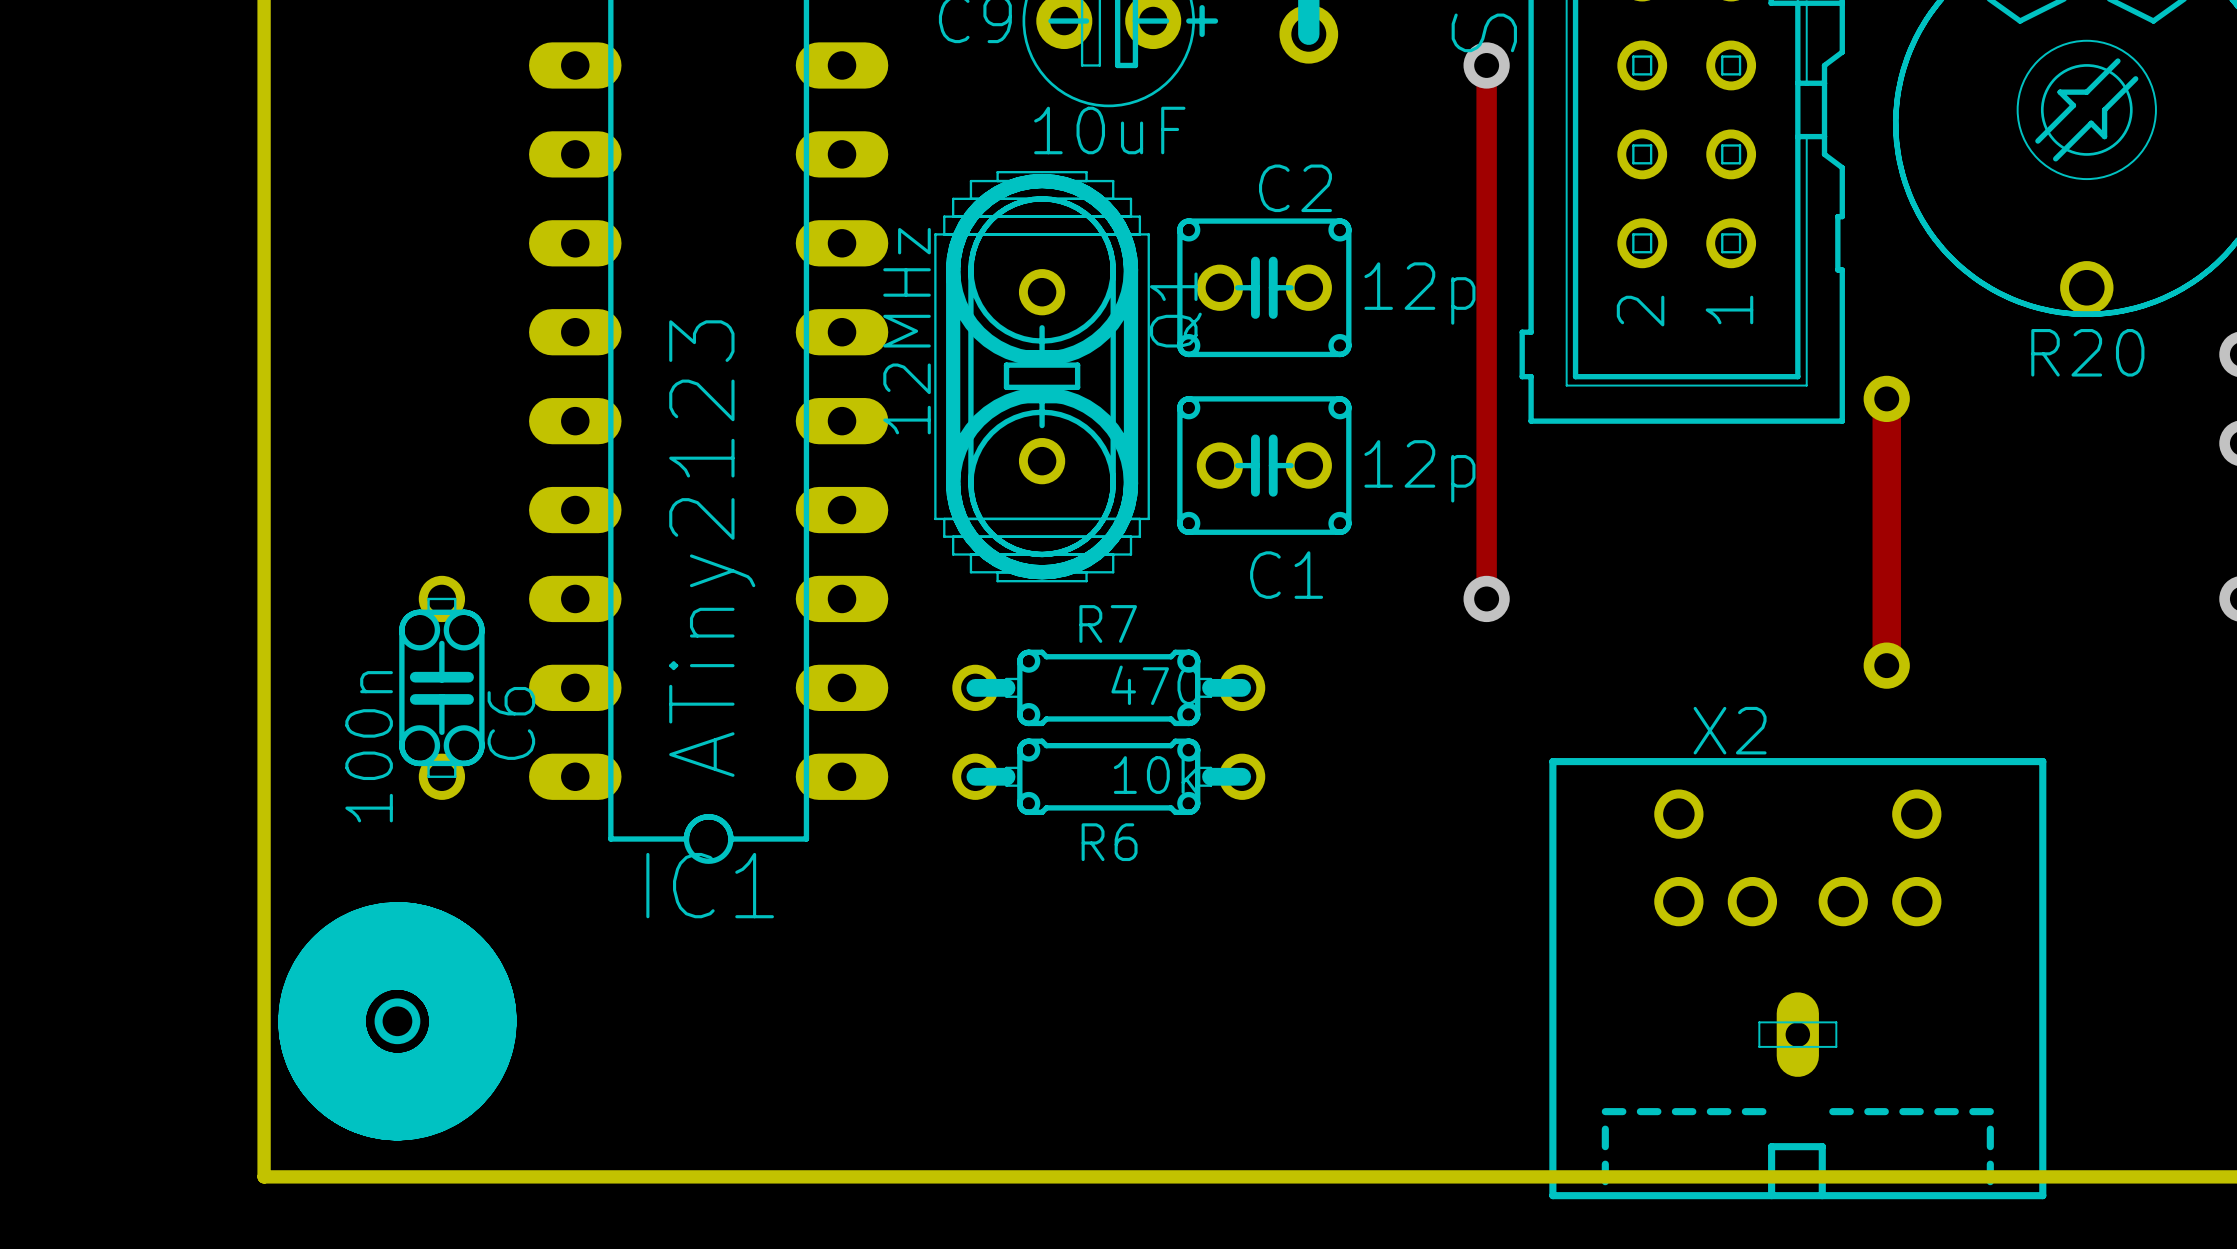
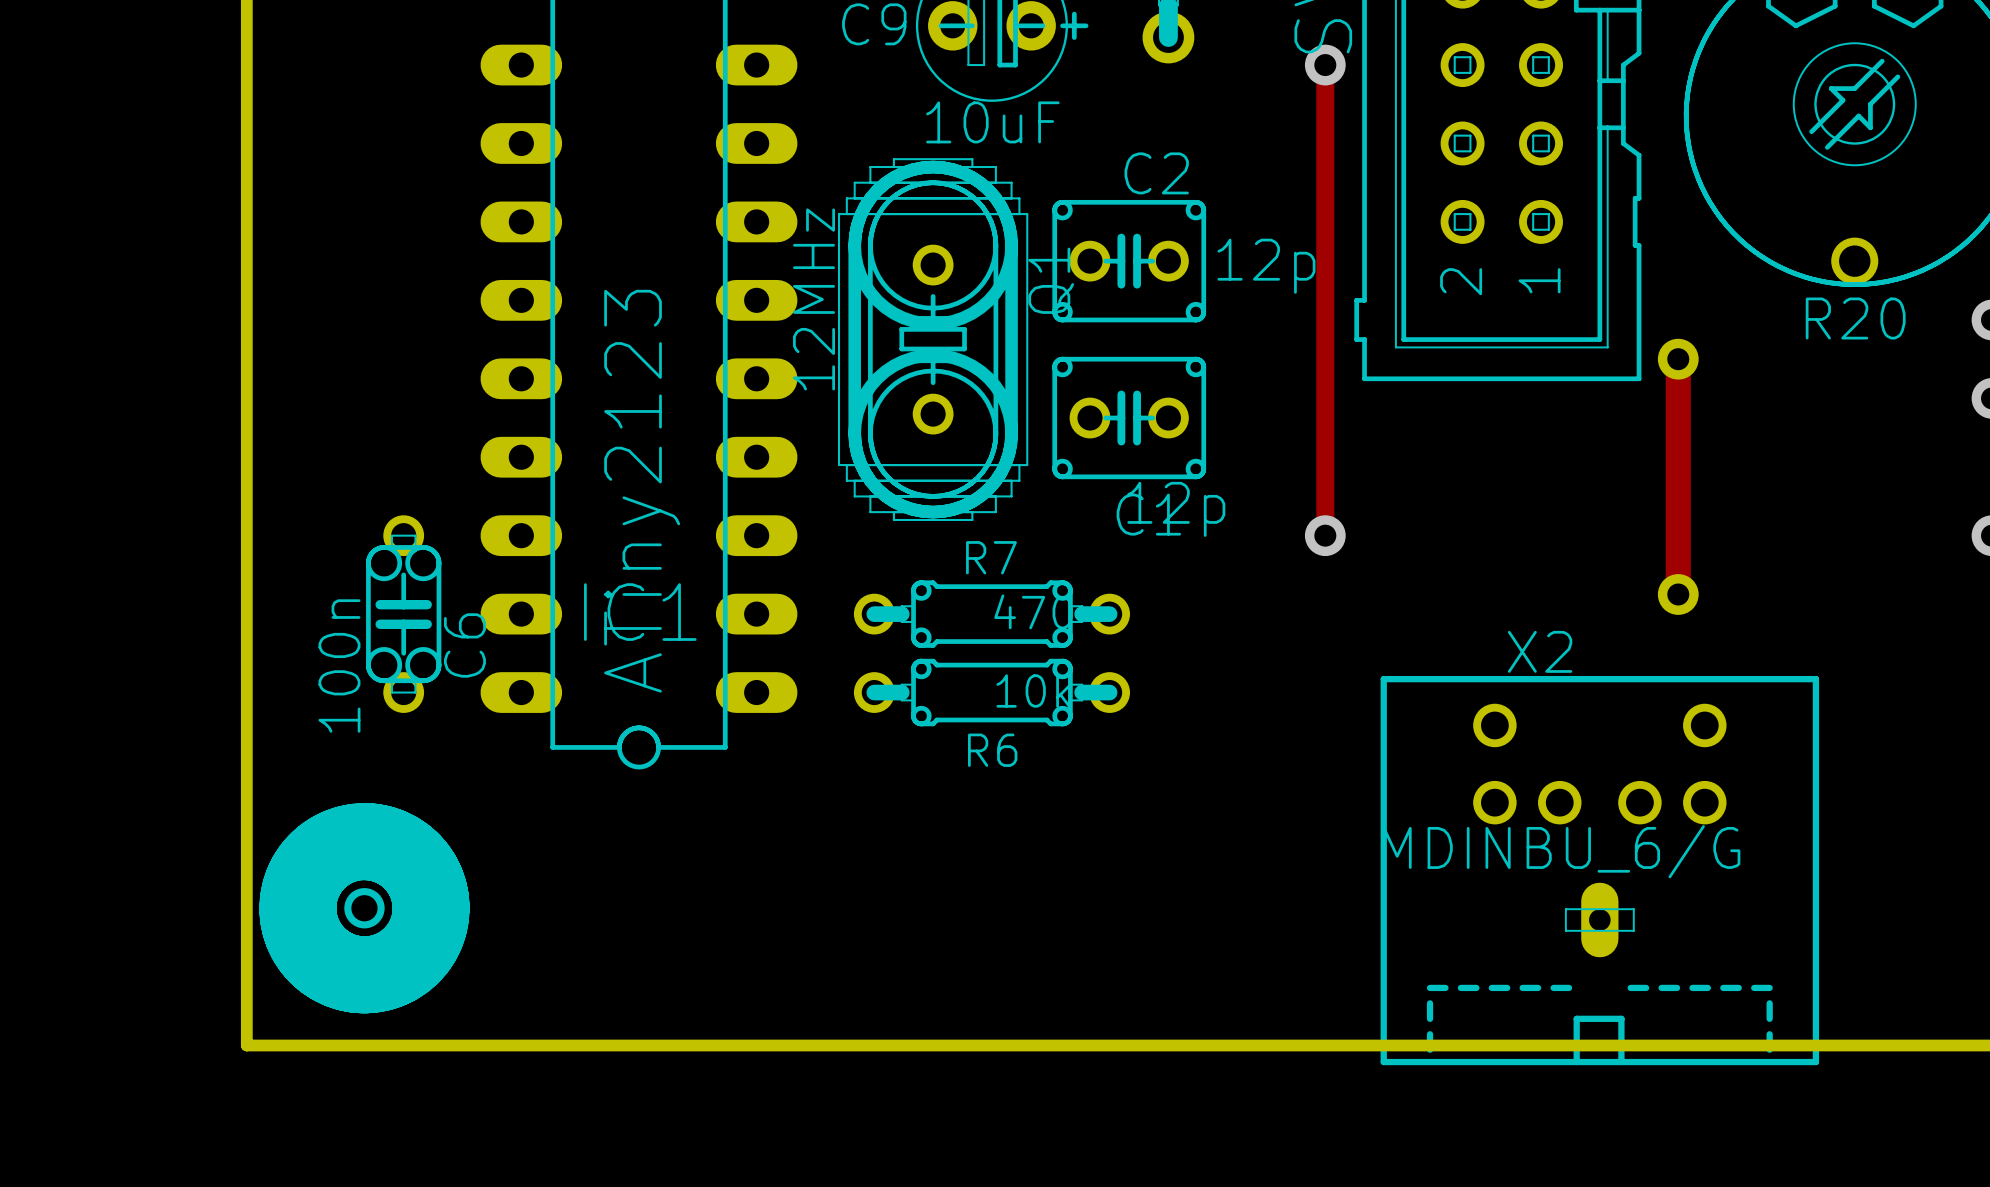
C1 value position: 12p (1419, 471) -> 12p (1176, 509)
IC1 name position: IC1 (710, 885) -> IC1 (640, 612)
X2 value: none -> MDINBU_6/G (1561, 851)

